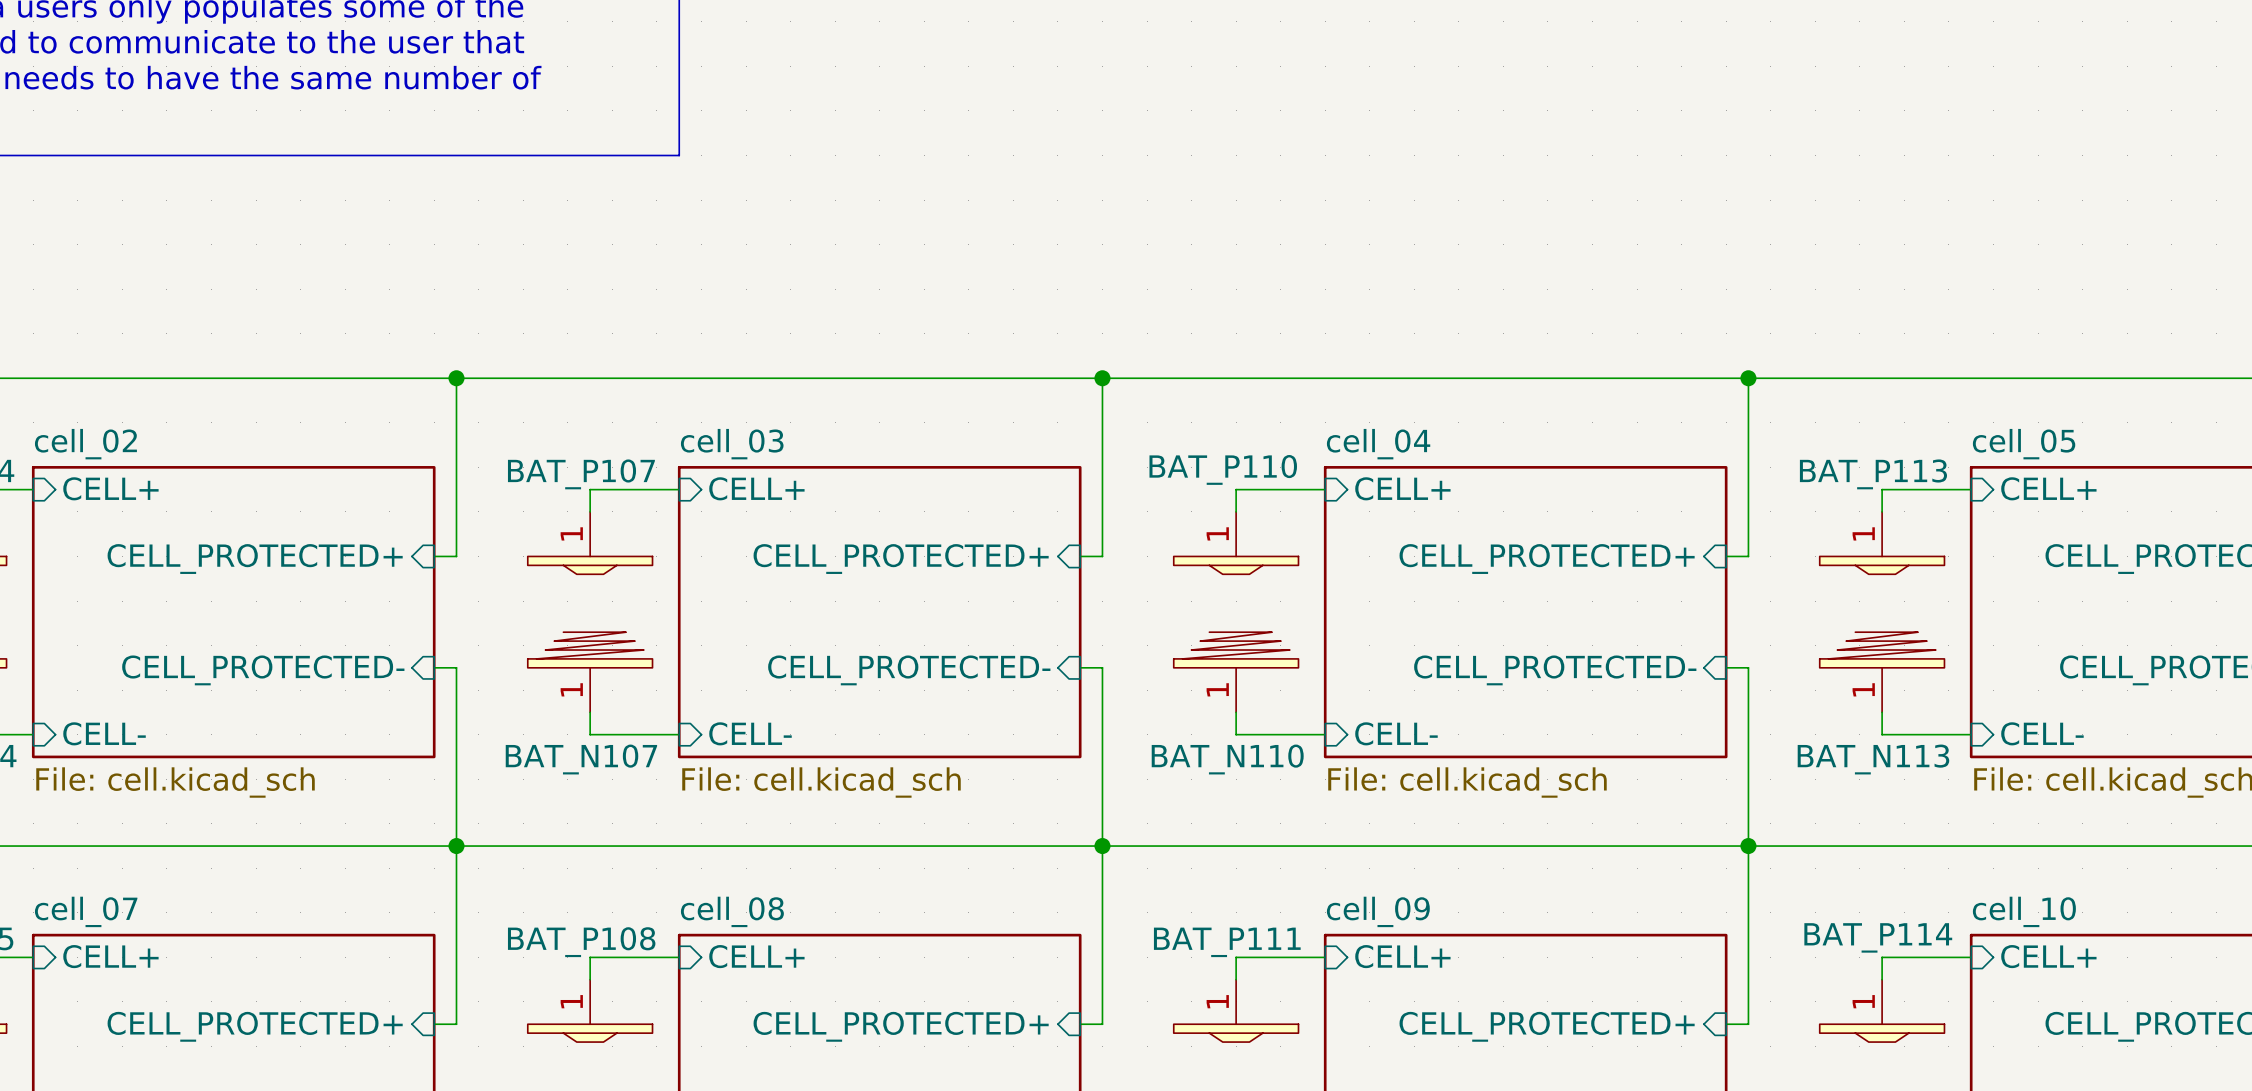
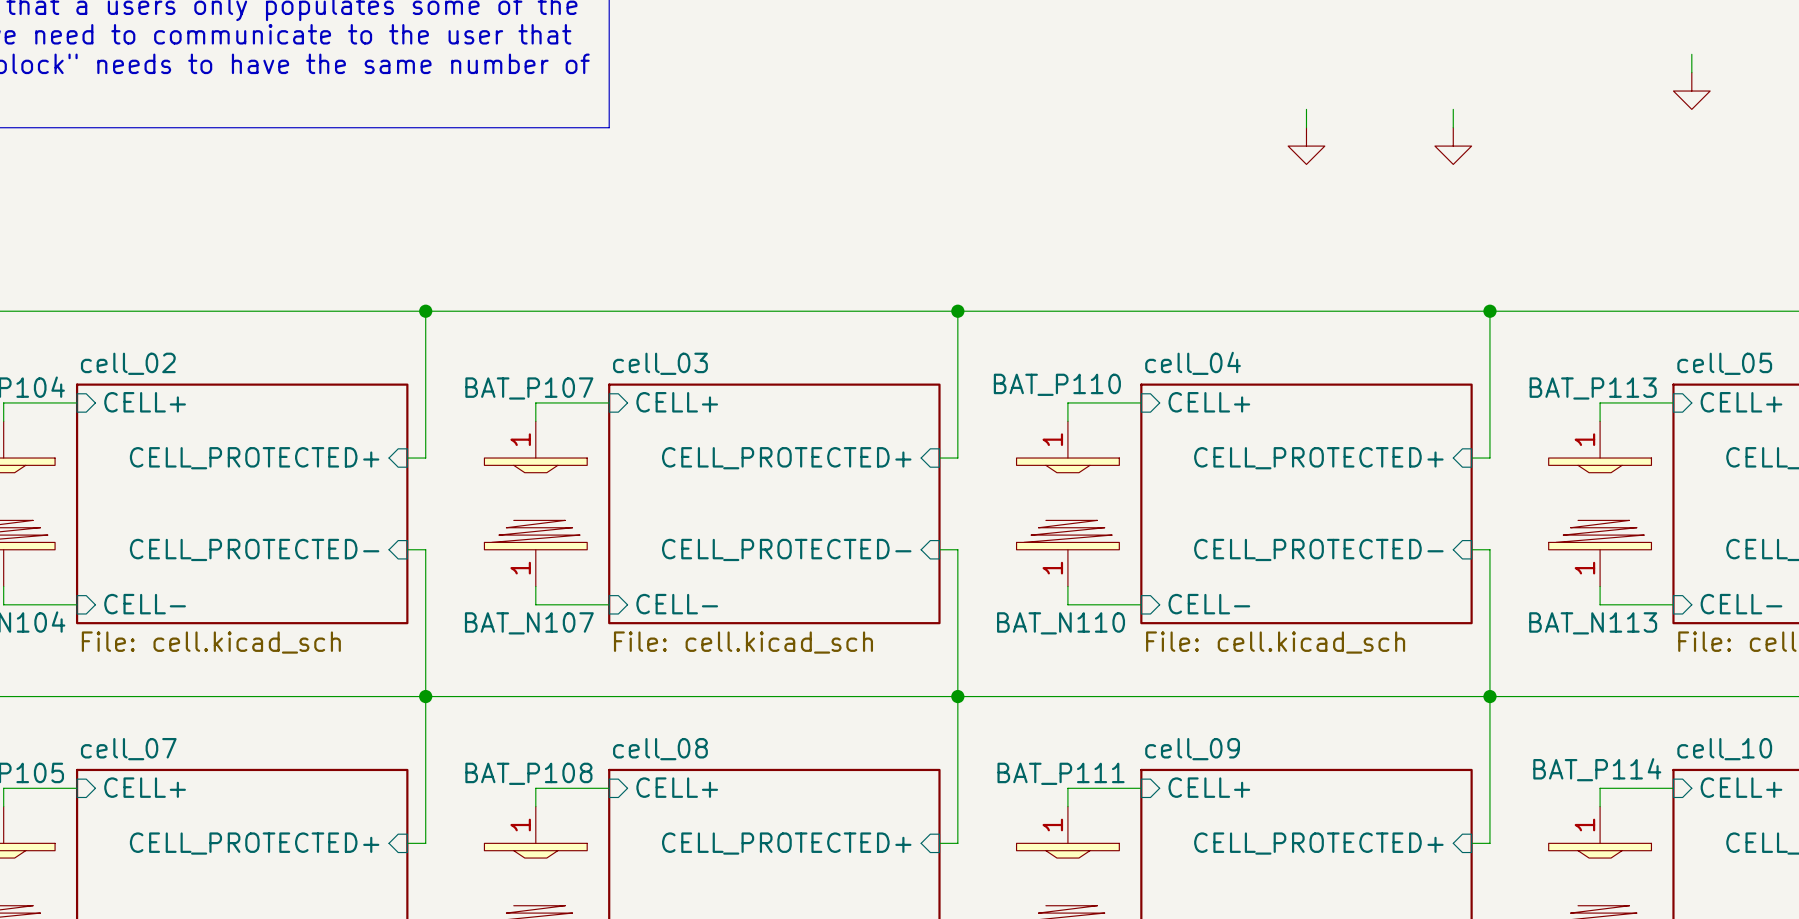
wire: none -> (1691, 54) (1691, 72)
power symbol: none -> (1691, 91)
wire: none -> (1306, 109) (1306, 127)
wire: none -> (1453, 109) (1453, 127)
power symbol: none -> (1306, 146)
power symbol: none -> (1453, 146)

